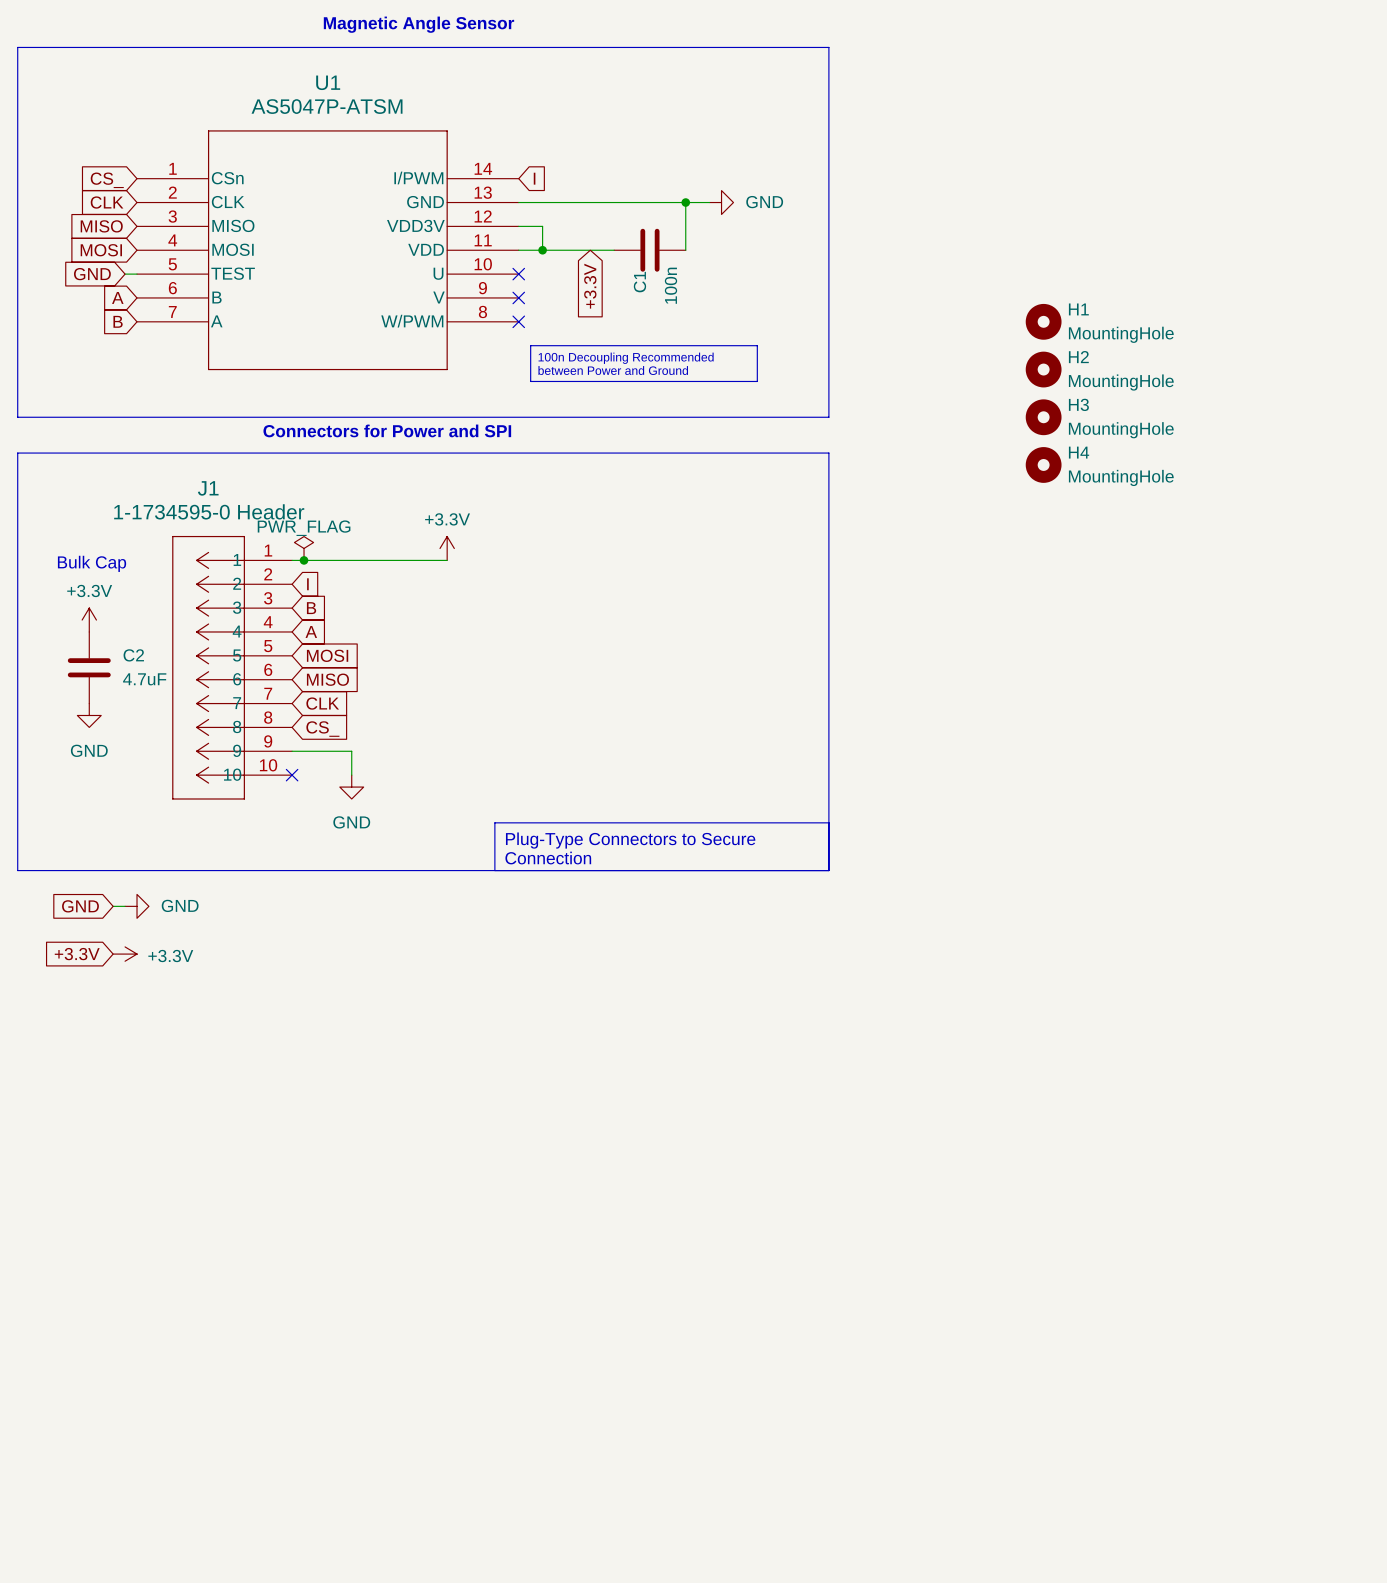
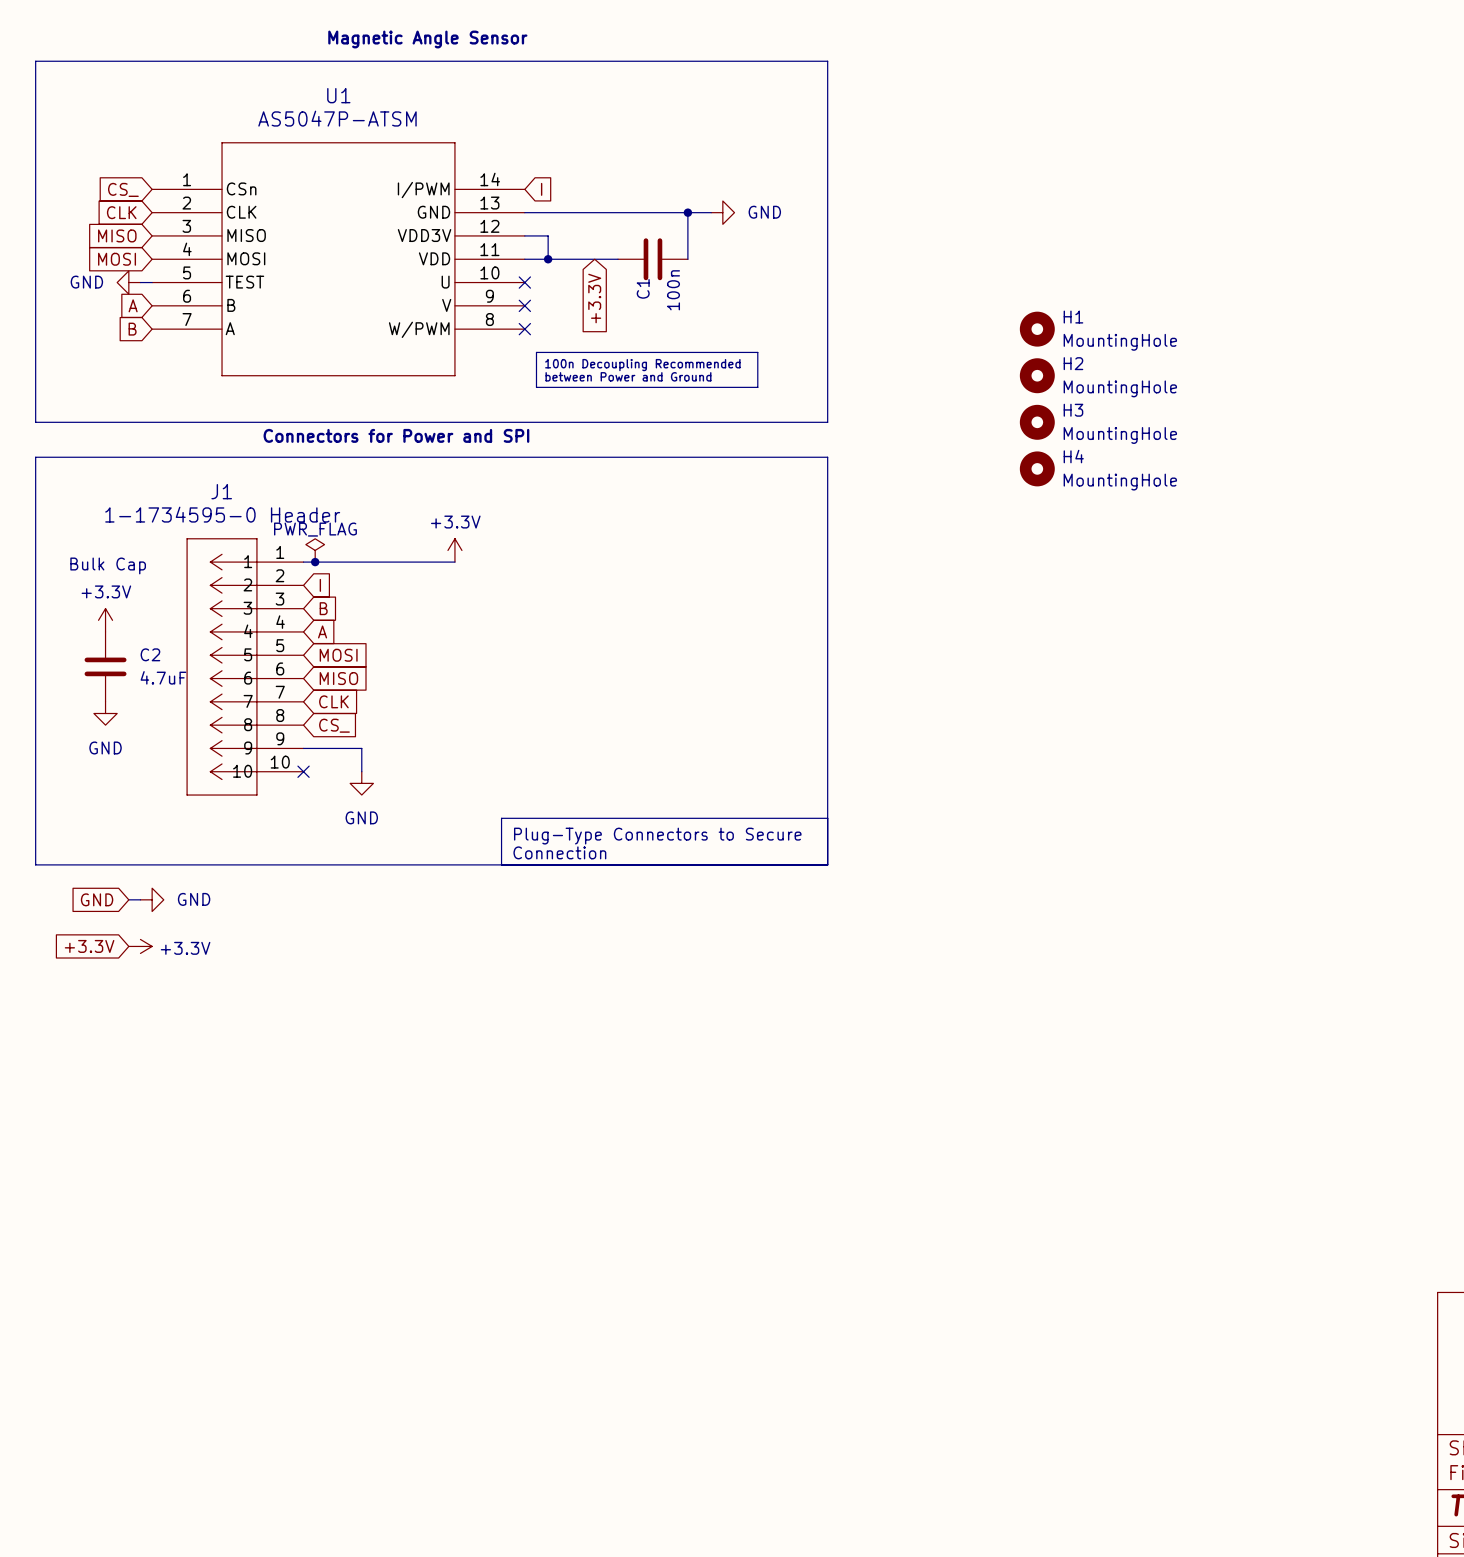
global label: GND (92, 274) -> none
power symbol: none -> GND (128, 282)

